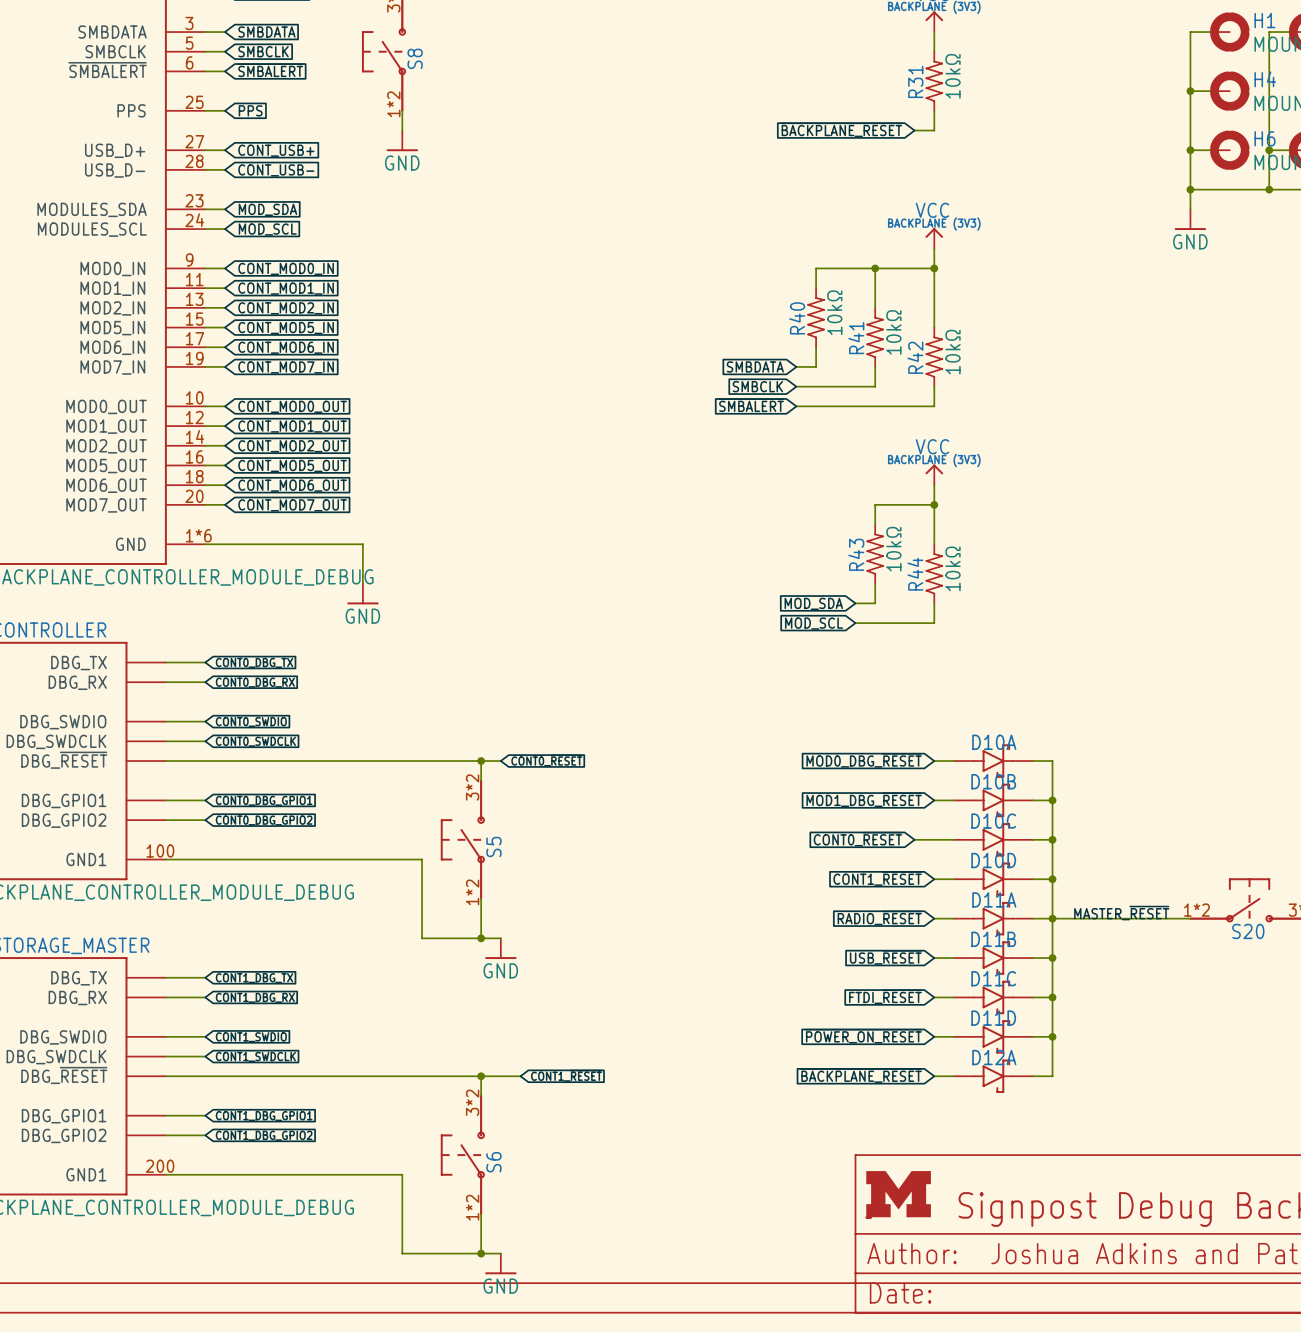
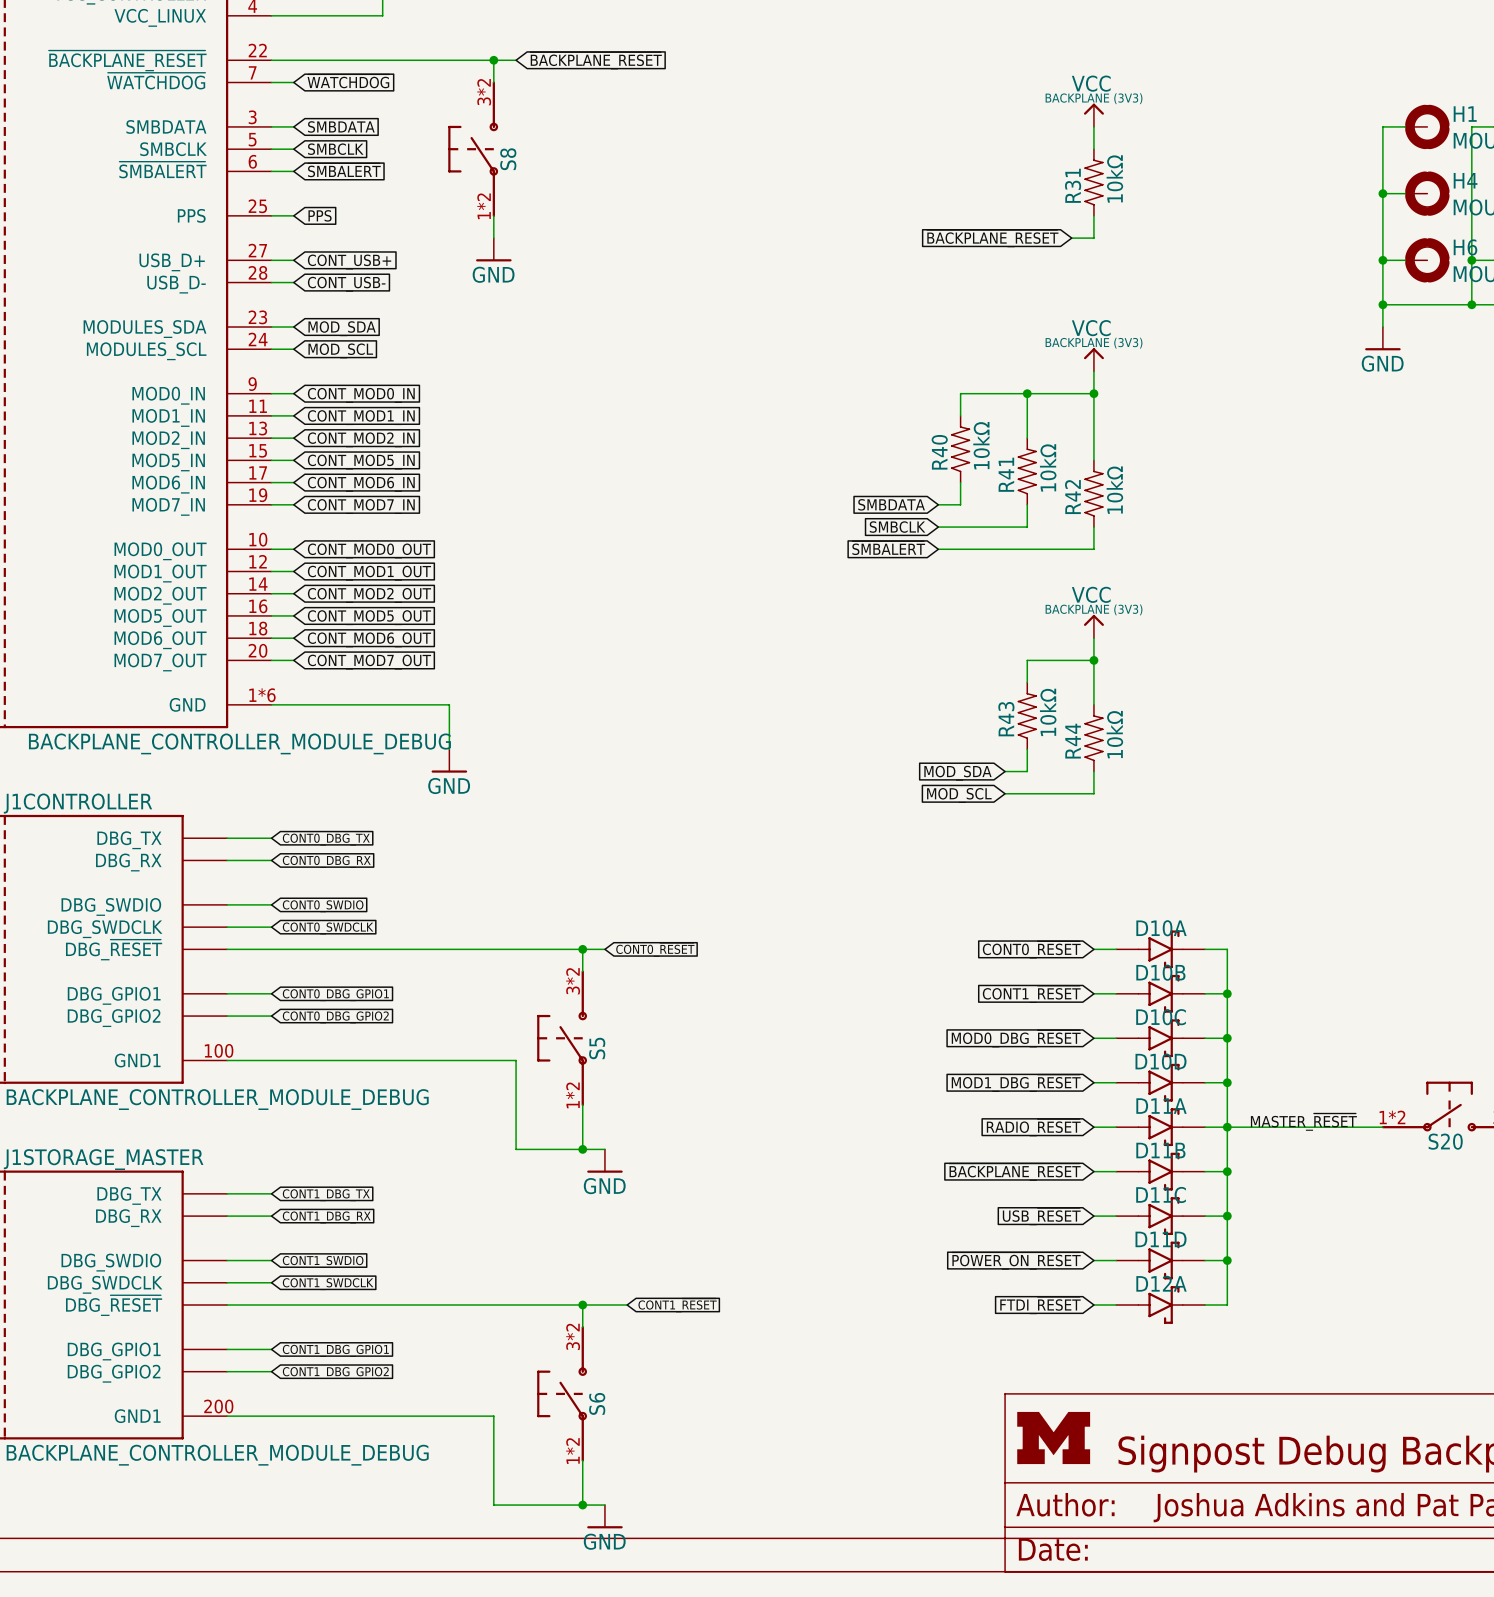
global label: MOD0_DBG_~{RESET} (864, 760) -> CONT0_~{RESET} (1031, 949)
global label: MOD1_DBG_~{RESET} (864, 799) -> CONT1_~{RESET} (1031, 994)
global label: CONT0_~{RESET} (857, 839) -> MOD0_DBG_~{RESET} (1016, 1038)
wire: (914, 839) (934, 839) -> none
global label: CONT1_~{RESET} (877, 878) -> MOD1_DBG_~{RESET} (1016, 1083)
global label: USB_~{RESET} (885, 957) -> ~{BACKPLANE_RESET} (1014, 1172)
global label: FTDI_~{RESET} (885, 996) -> USB_~{RESET} (1041, 1216)
global label: ~{BACKPLANE_RESET} (860, 1075) -> FTDI_~{RESET} (1040, 1305)

